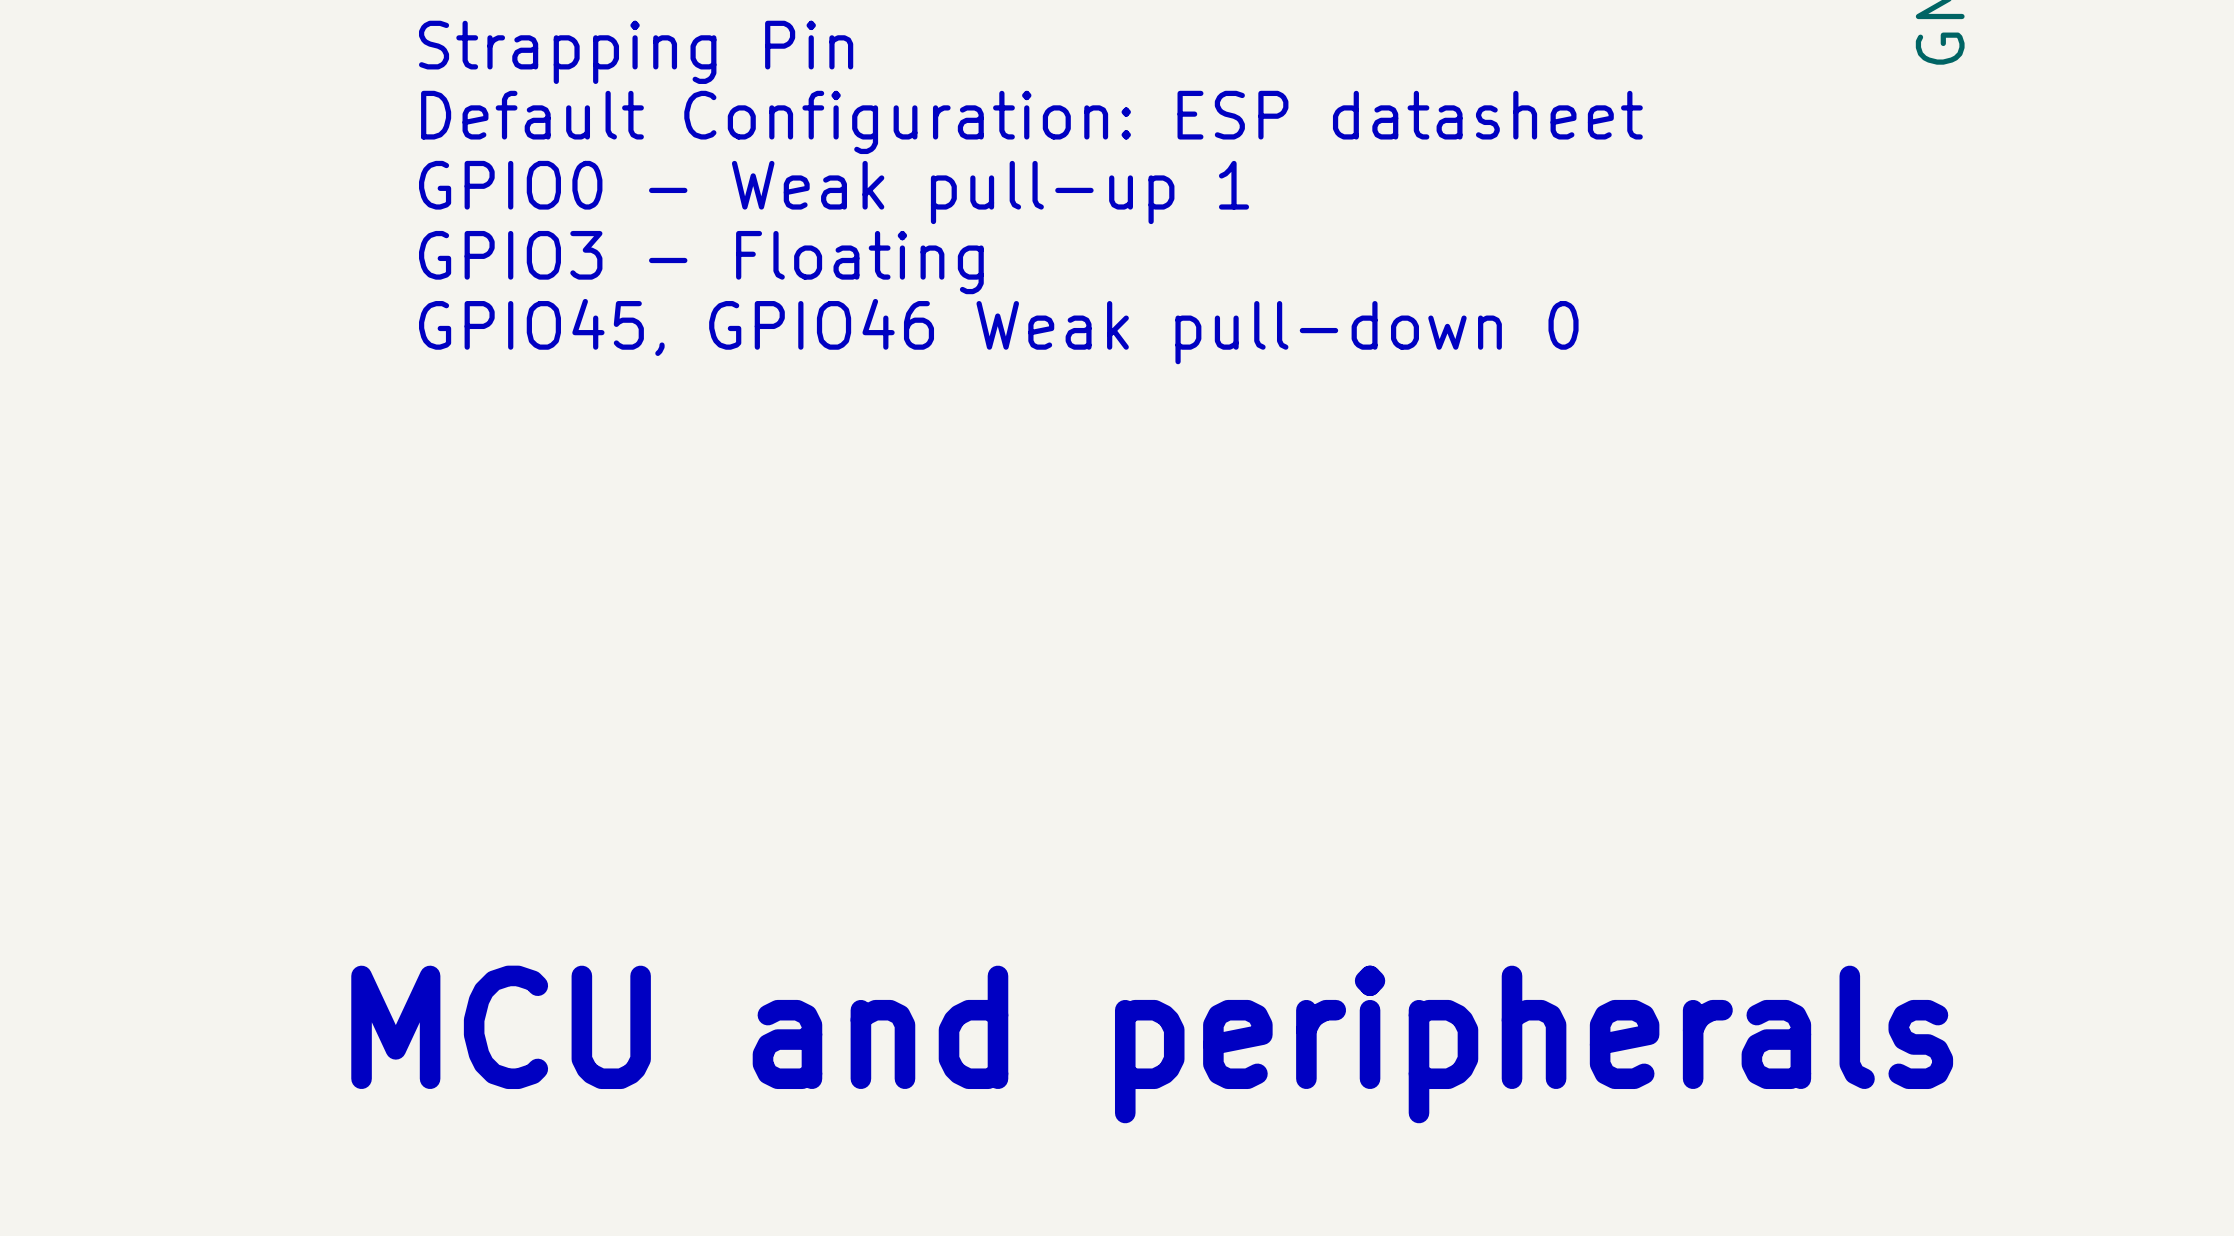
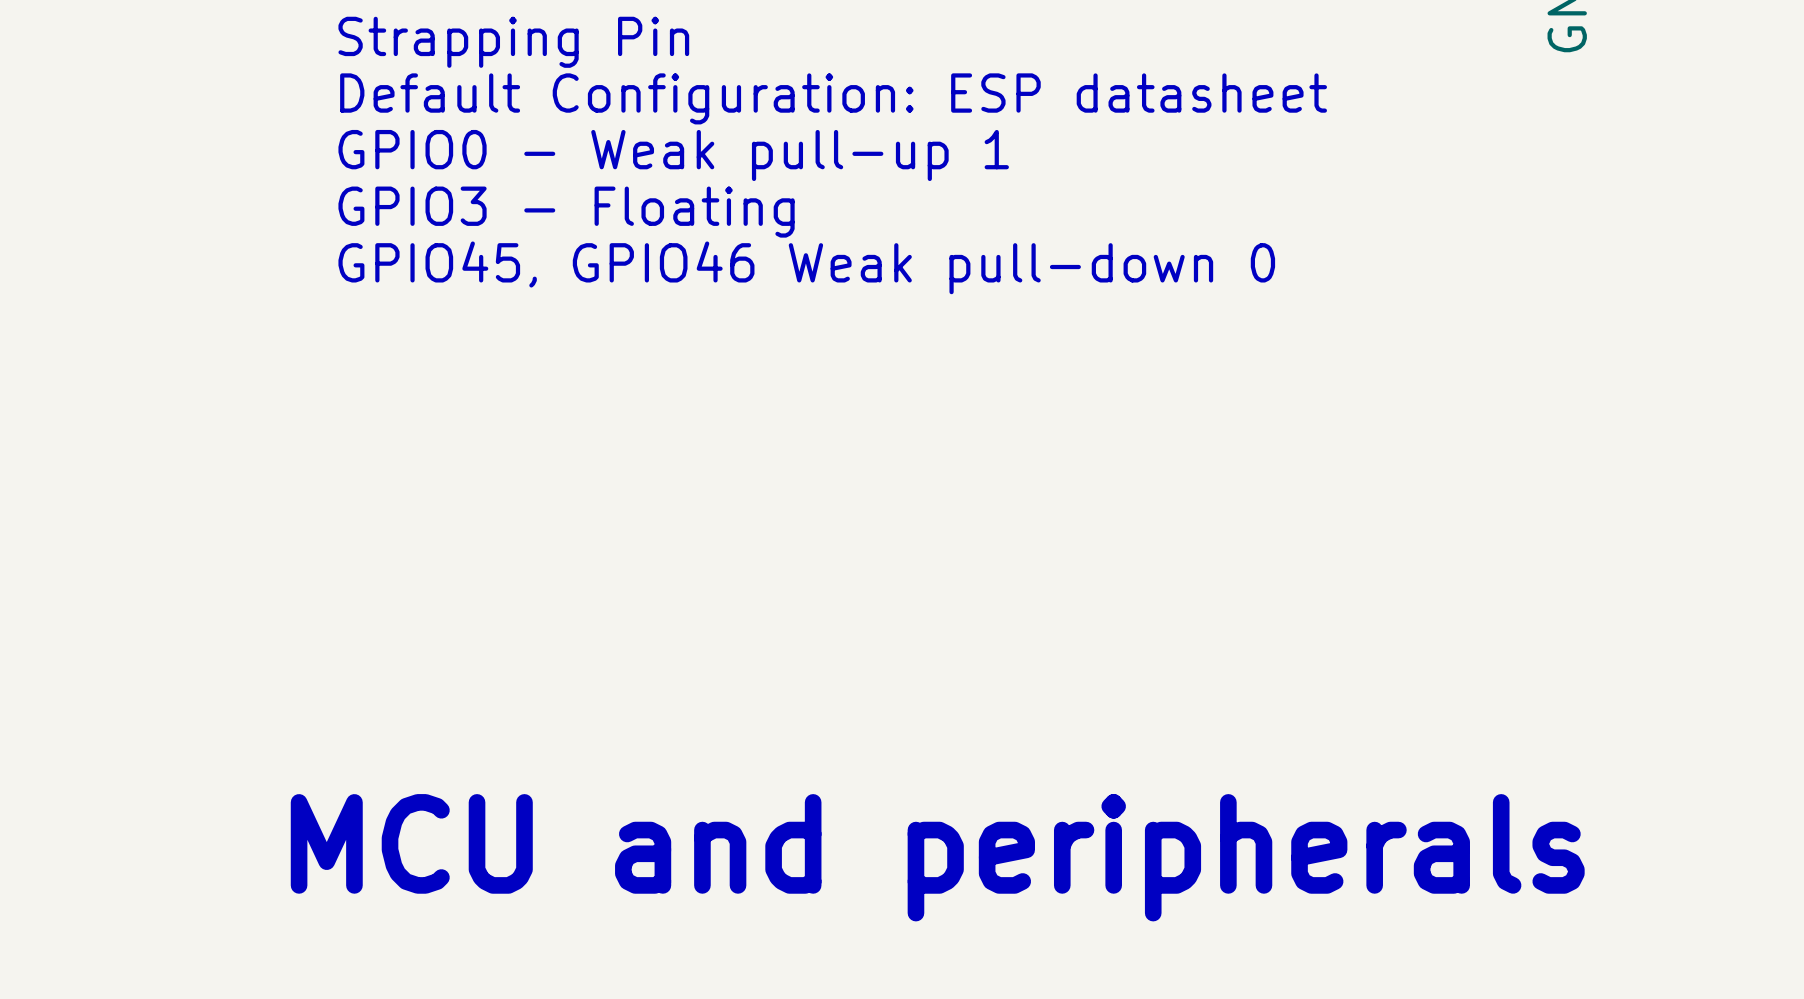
text position: MCU and peripherals (1152, 1044) -> MCU and peripherals (937, 857)

